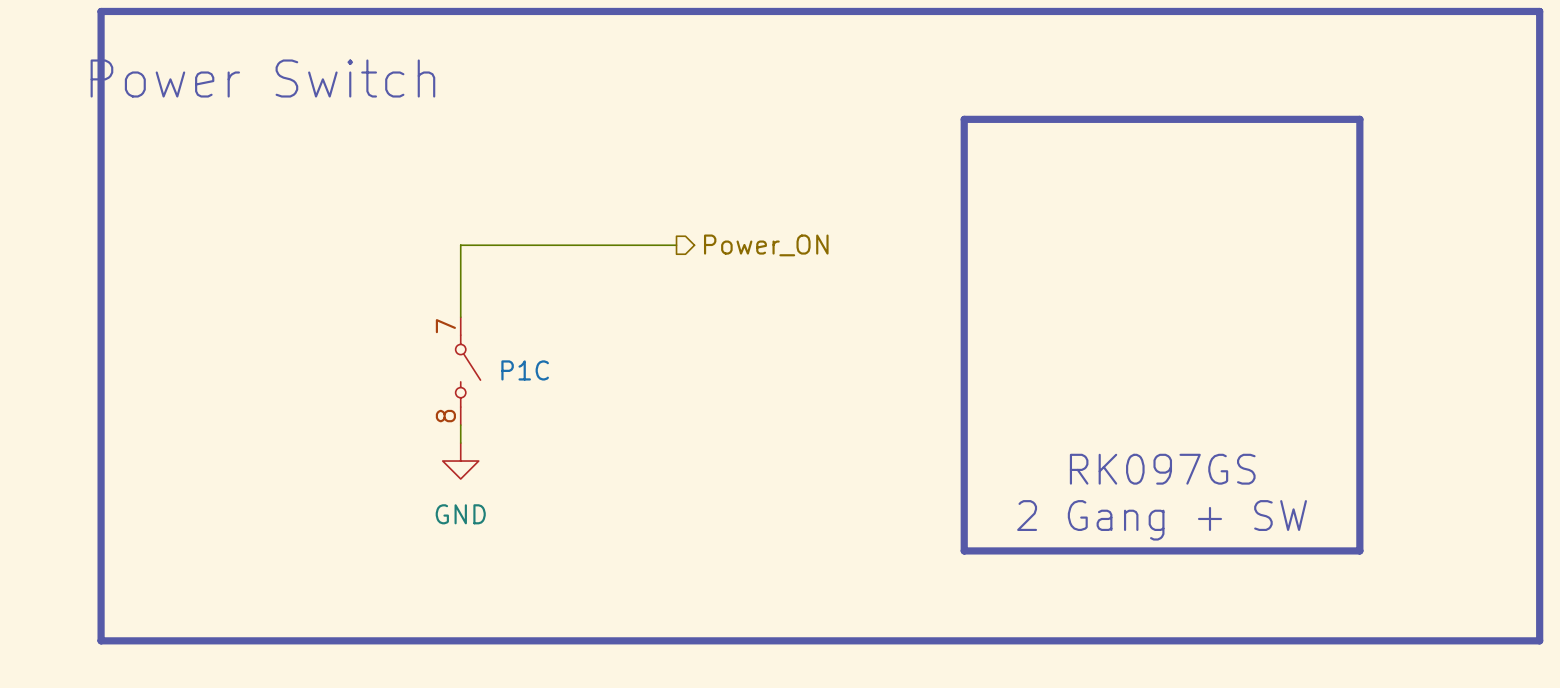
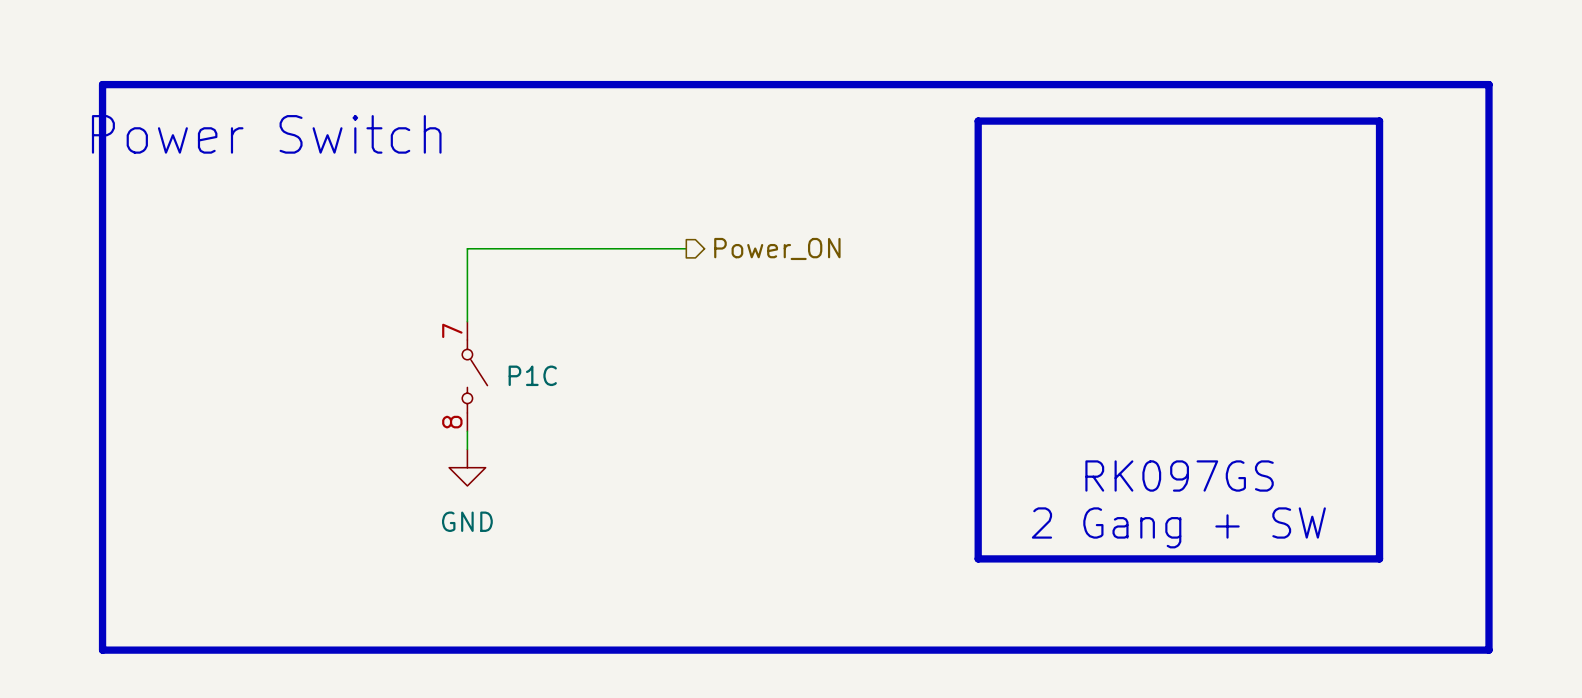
text position: Power Switch (262, 78) -> Power Switch (266, 134)
line: (101, 83) (101, 11) (1539, 11) (1539, 640) (1467, 640) -> (102, 84) (1488, 84) (1488, 650)

